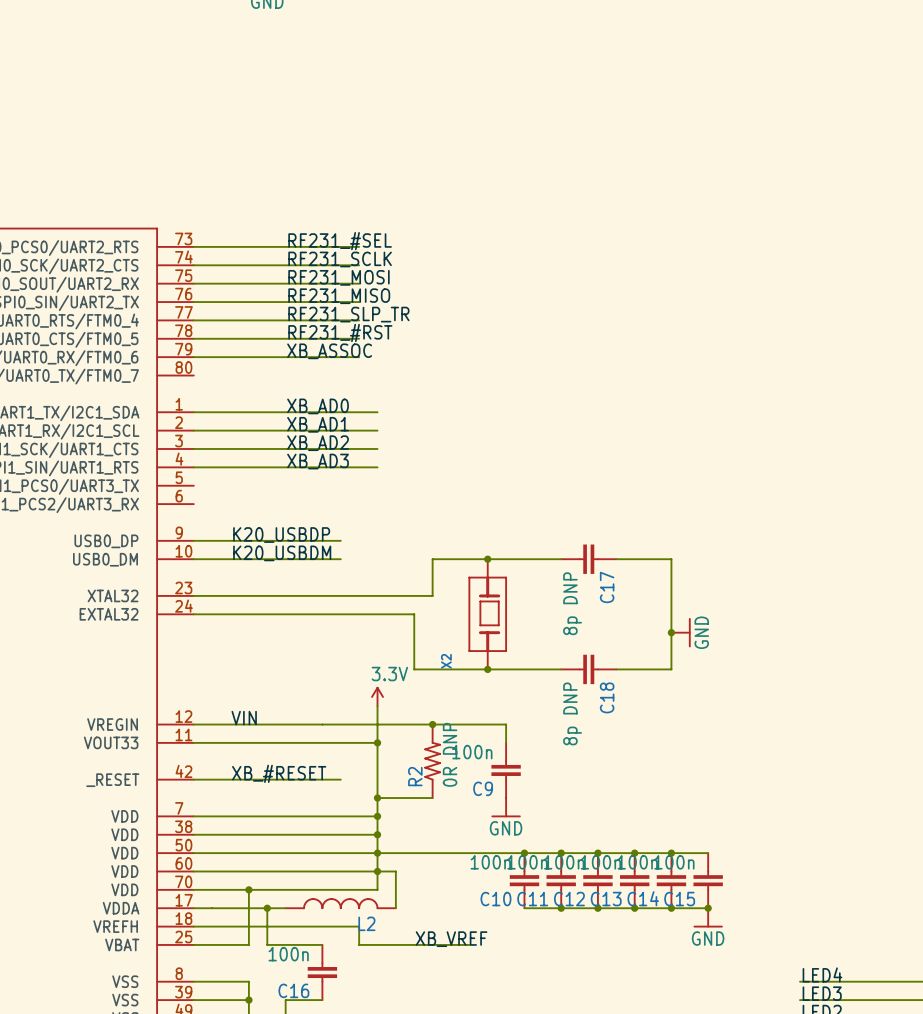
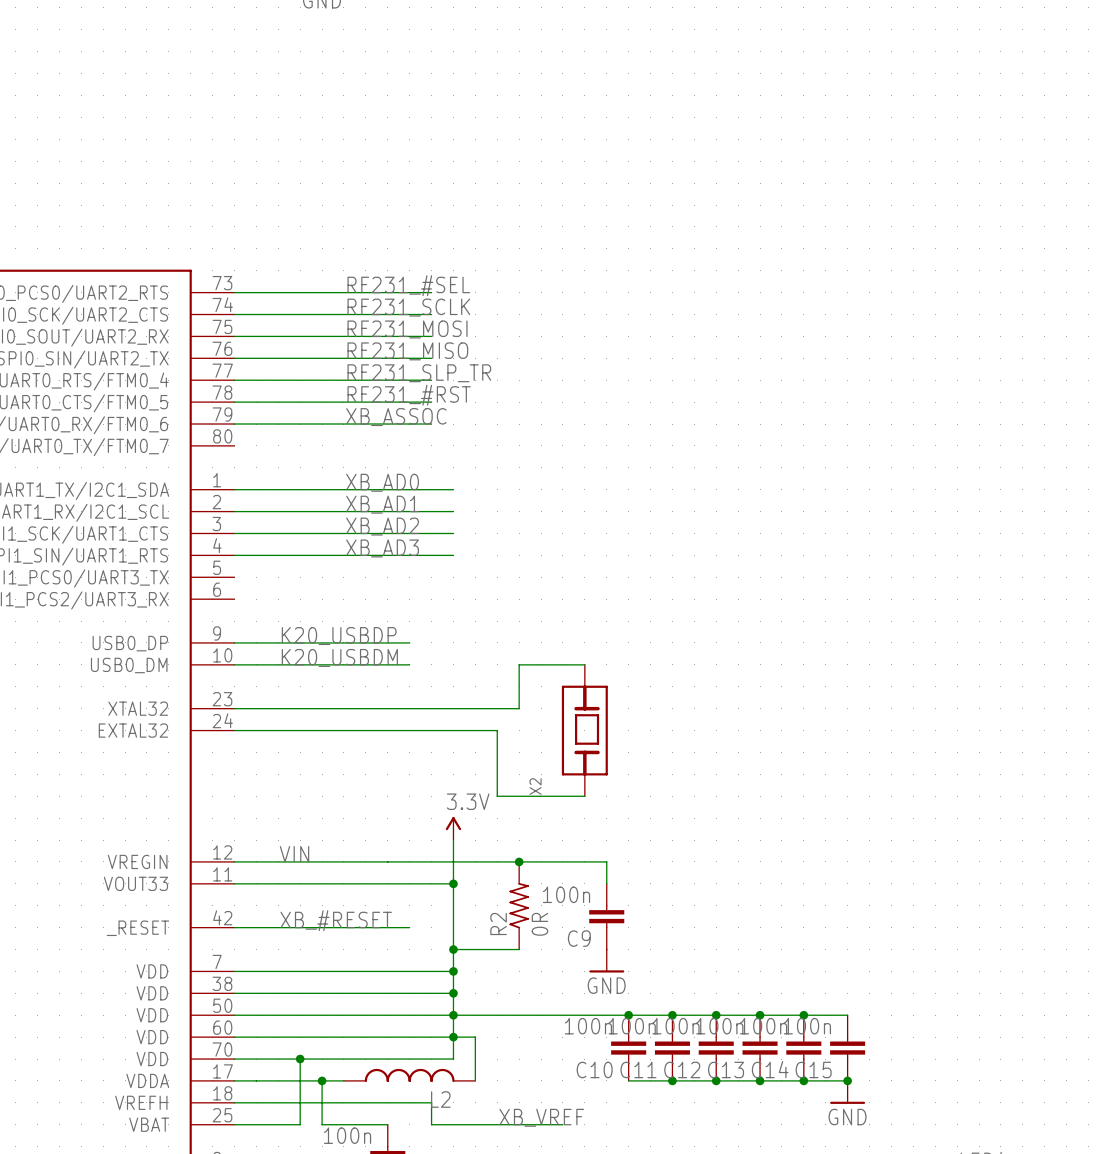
wire: (487, 559) (561, 559) -> none
junction: (487, 559) -> none
C17: 8p DNP (588, 559) -> none
wire: (616, 559) (671, 559) (671, 669) (616, 669) -> none
junction: (671, 632) -> none
power symbol: GND (681, 632) -> none
wire: (487, 669) (561, 669) -> none
junction: (487, 669) -> none
C18: 8p DNP (588, 669) -> none
R2 value: 0R DNP (450, 754) -> 0R (539, 924)

